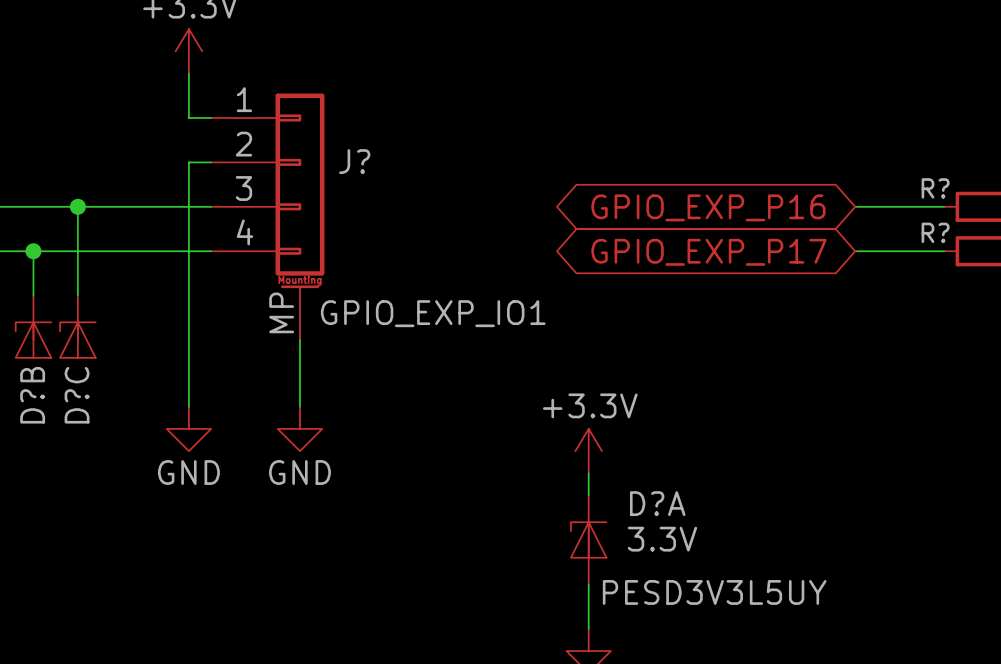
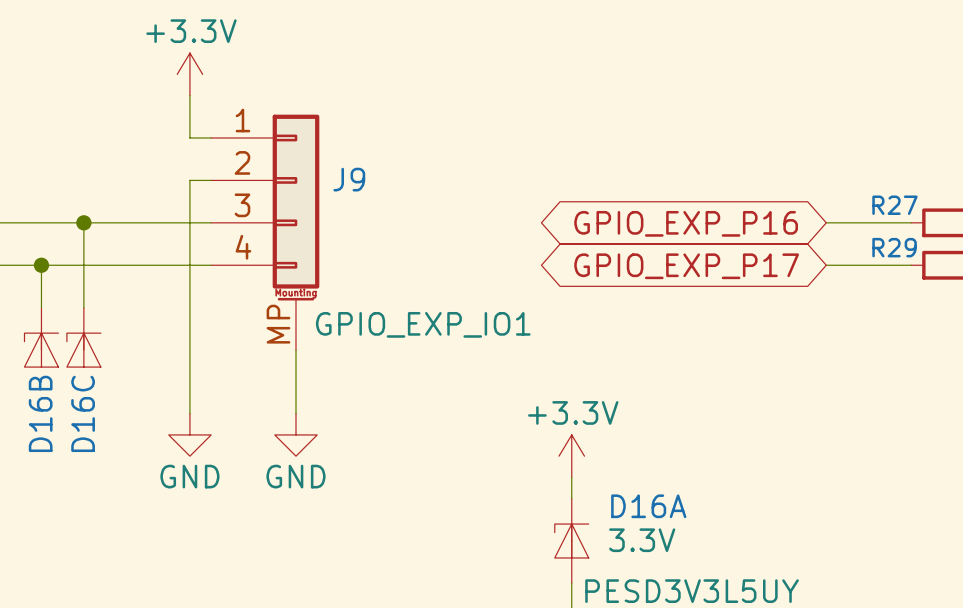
J? name: J? (354, 161) -> J9 (349, 179)
R? name: R? (935, 188) -> R27 (894, 205)
R? name: R? (935, 232) -> R29 (894, 247)
D?B name: D?B (32, 395) -> D16B (40, 413)
D?C name: D?C (77, 395) -> D16C (83, 413)
D?A name: D?A (657, 503) -> D16A (648, 506)

